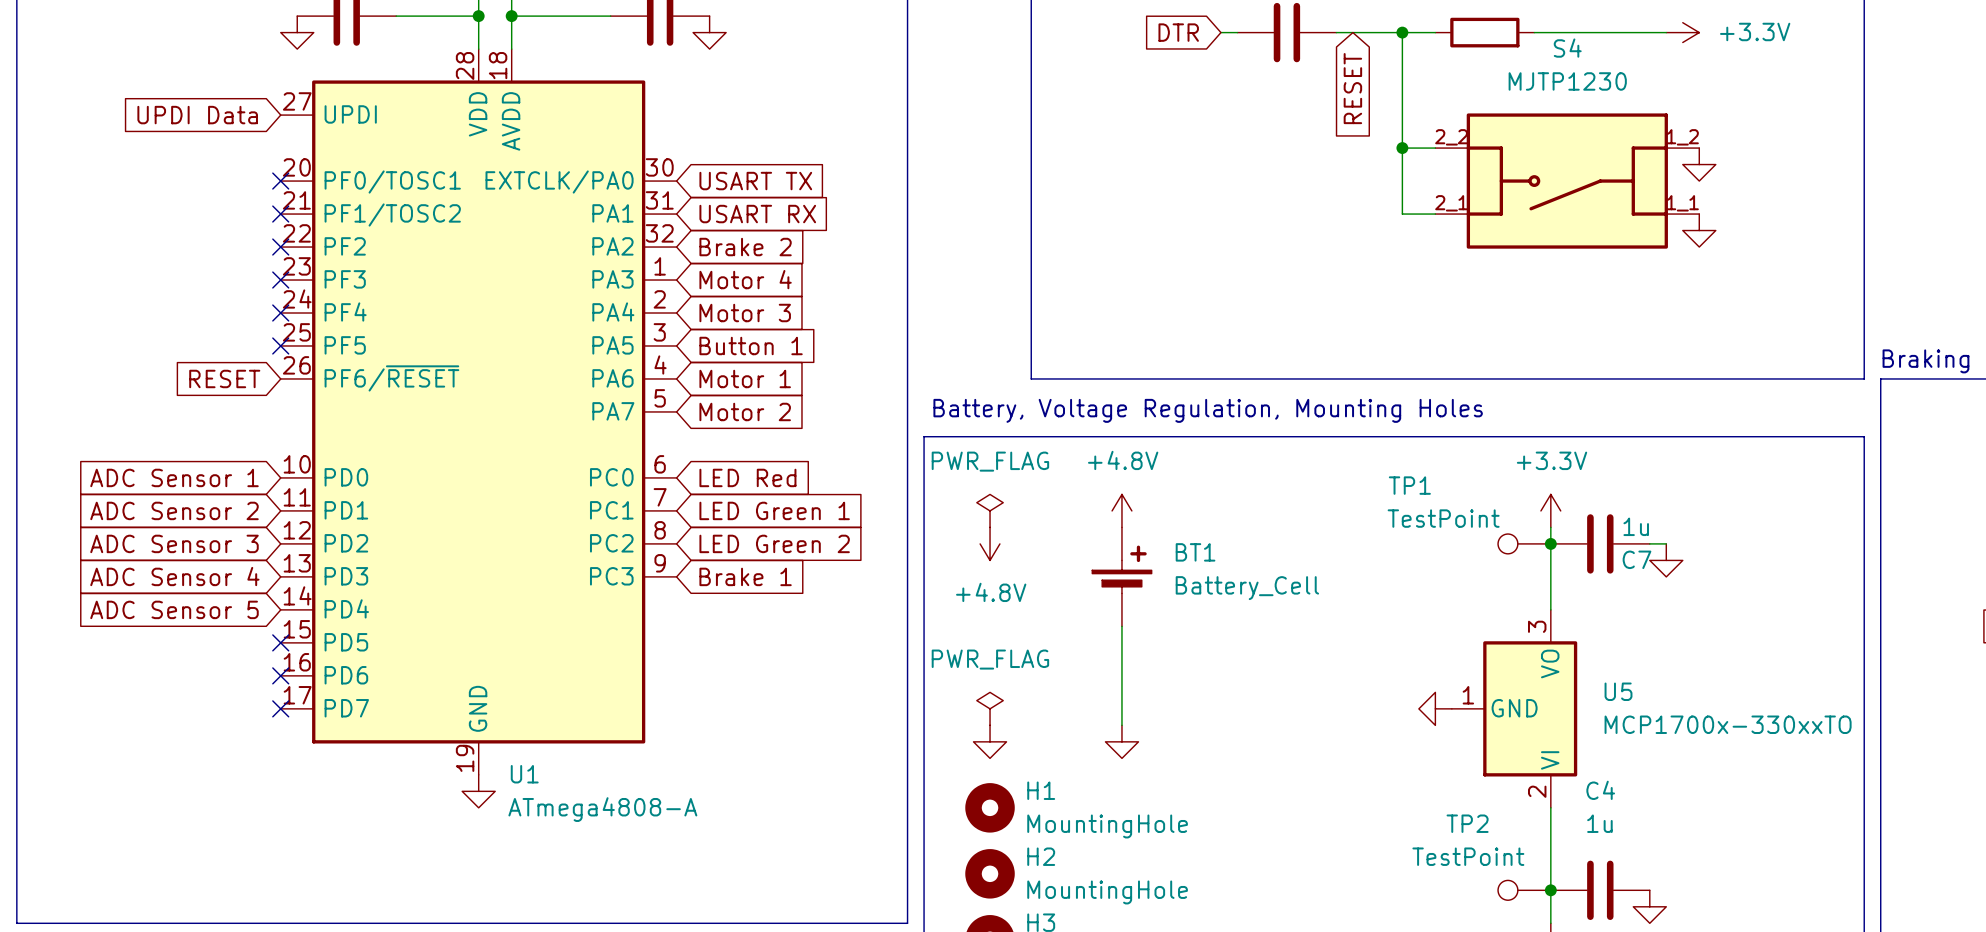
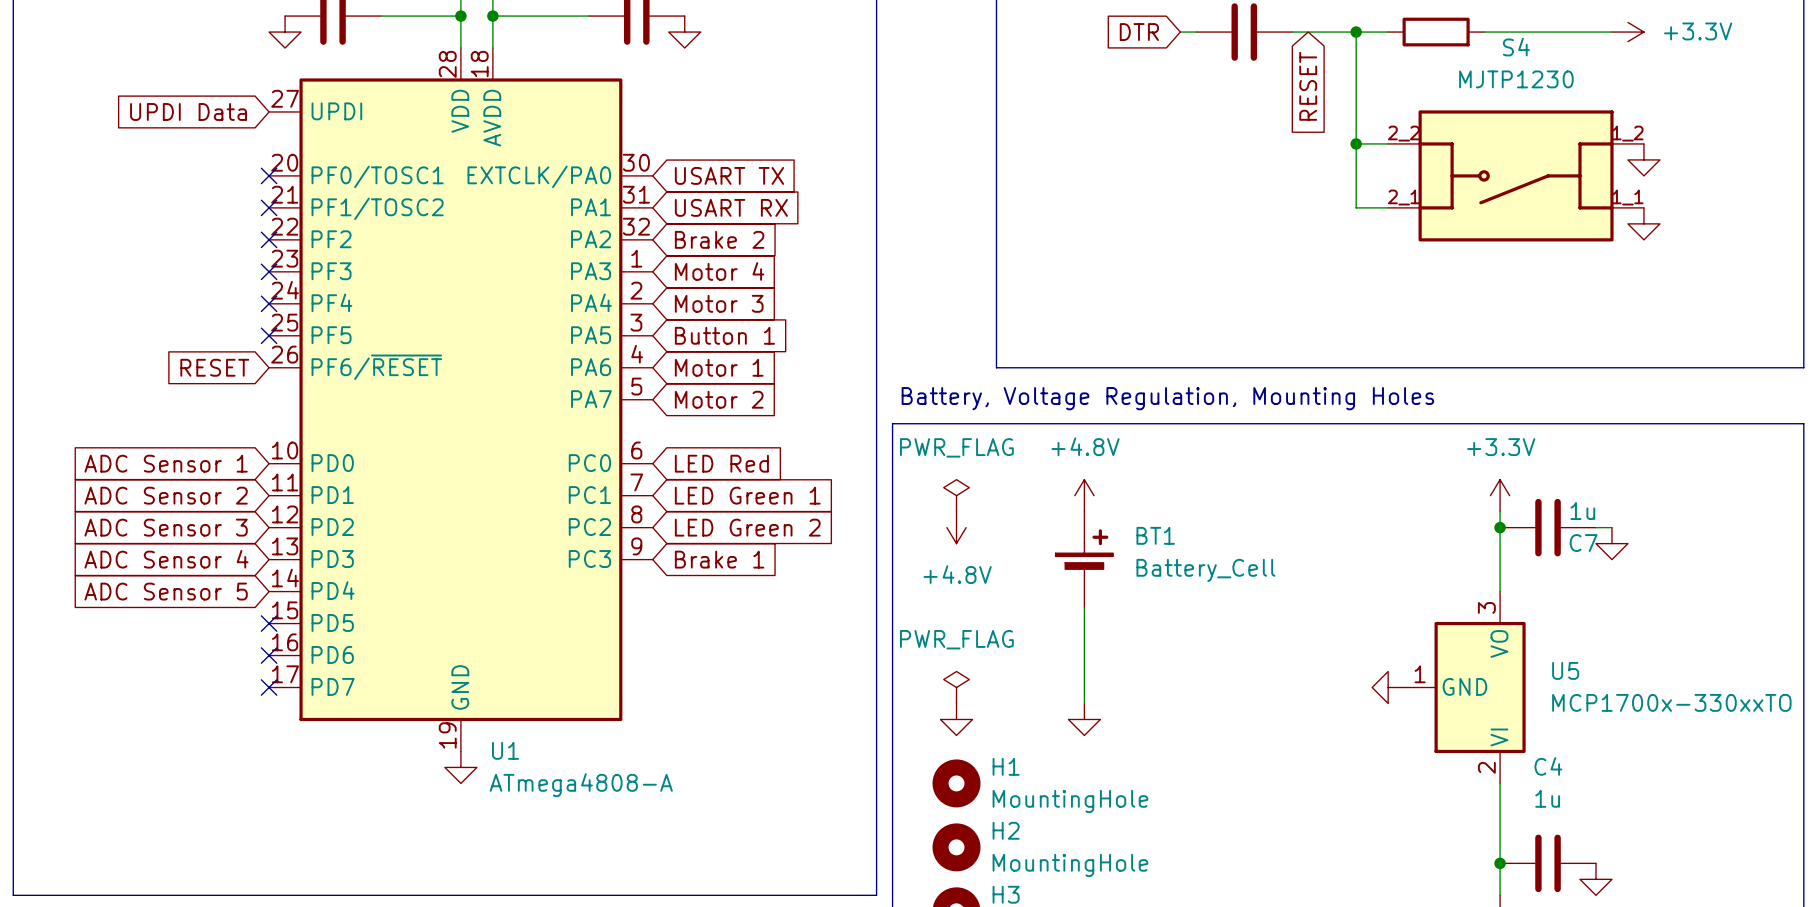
TP1: TestPoint (1524, 543) -> none
TP2: TestPoint (1524, 890) -> none

